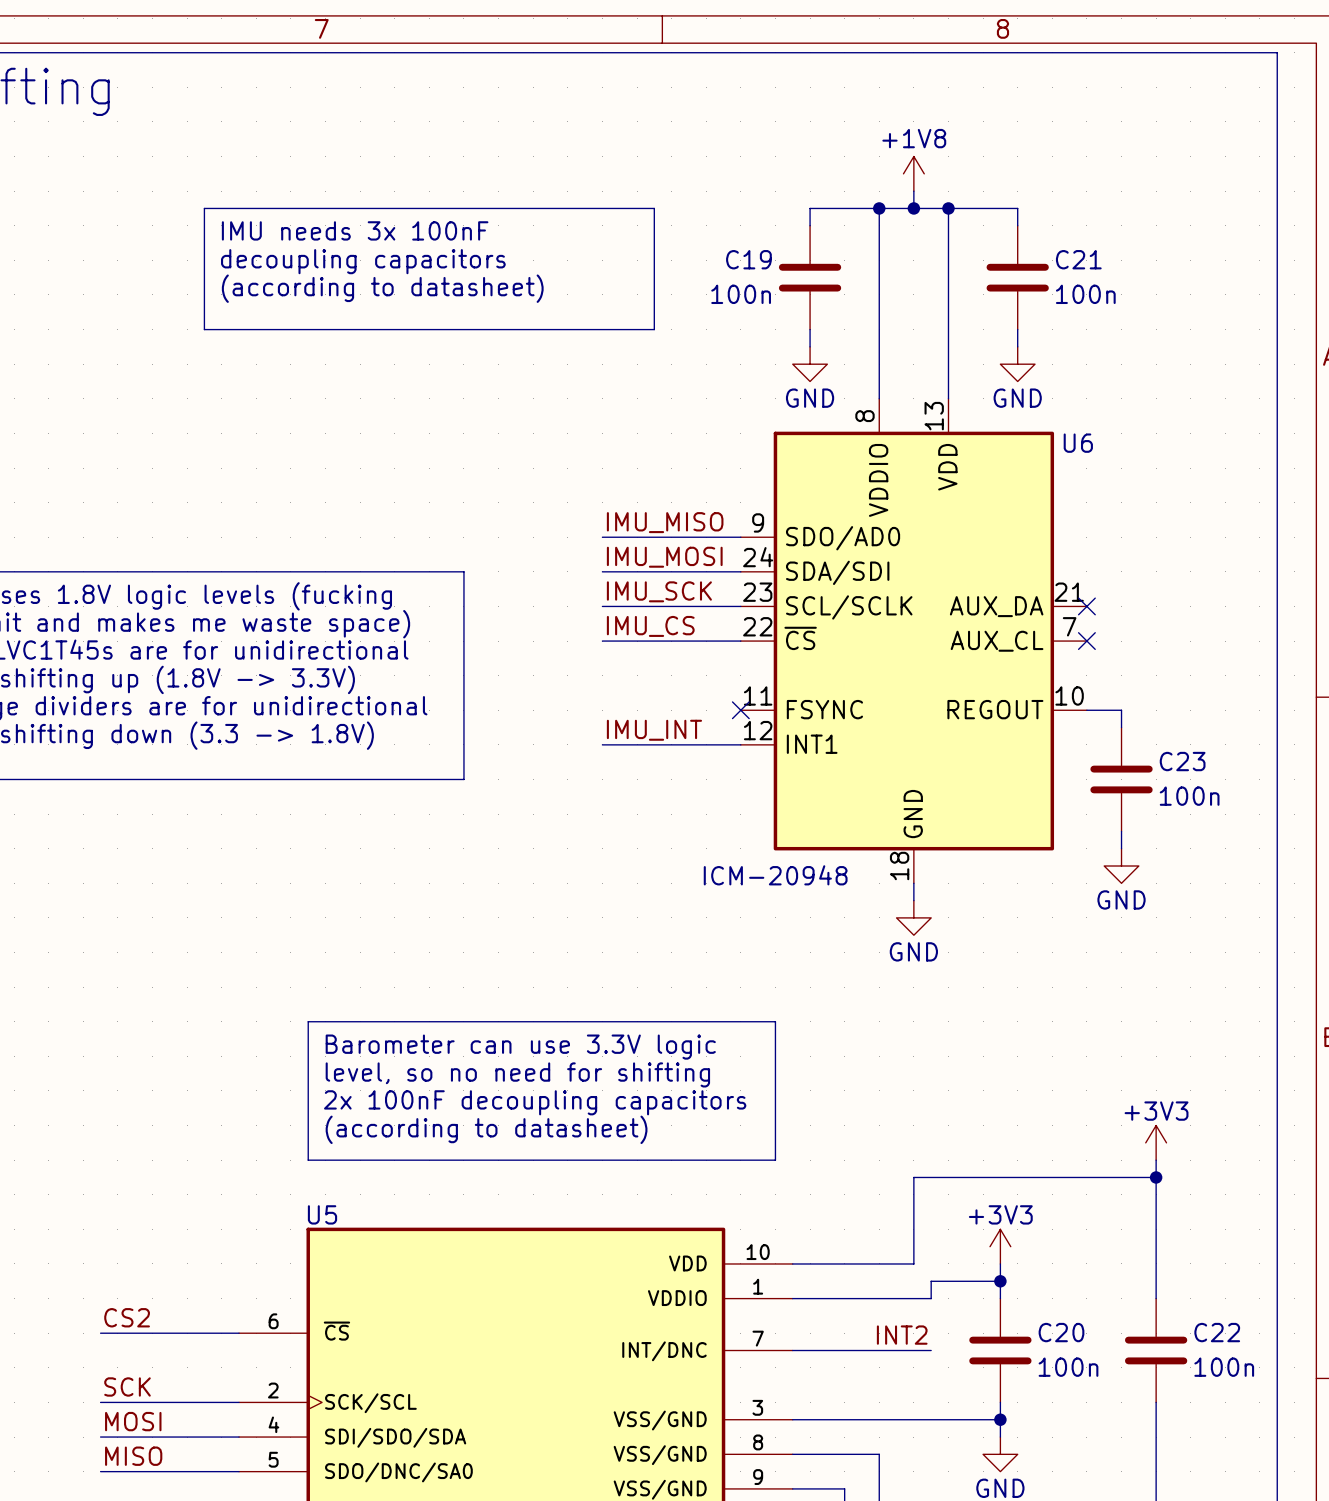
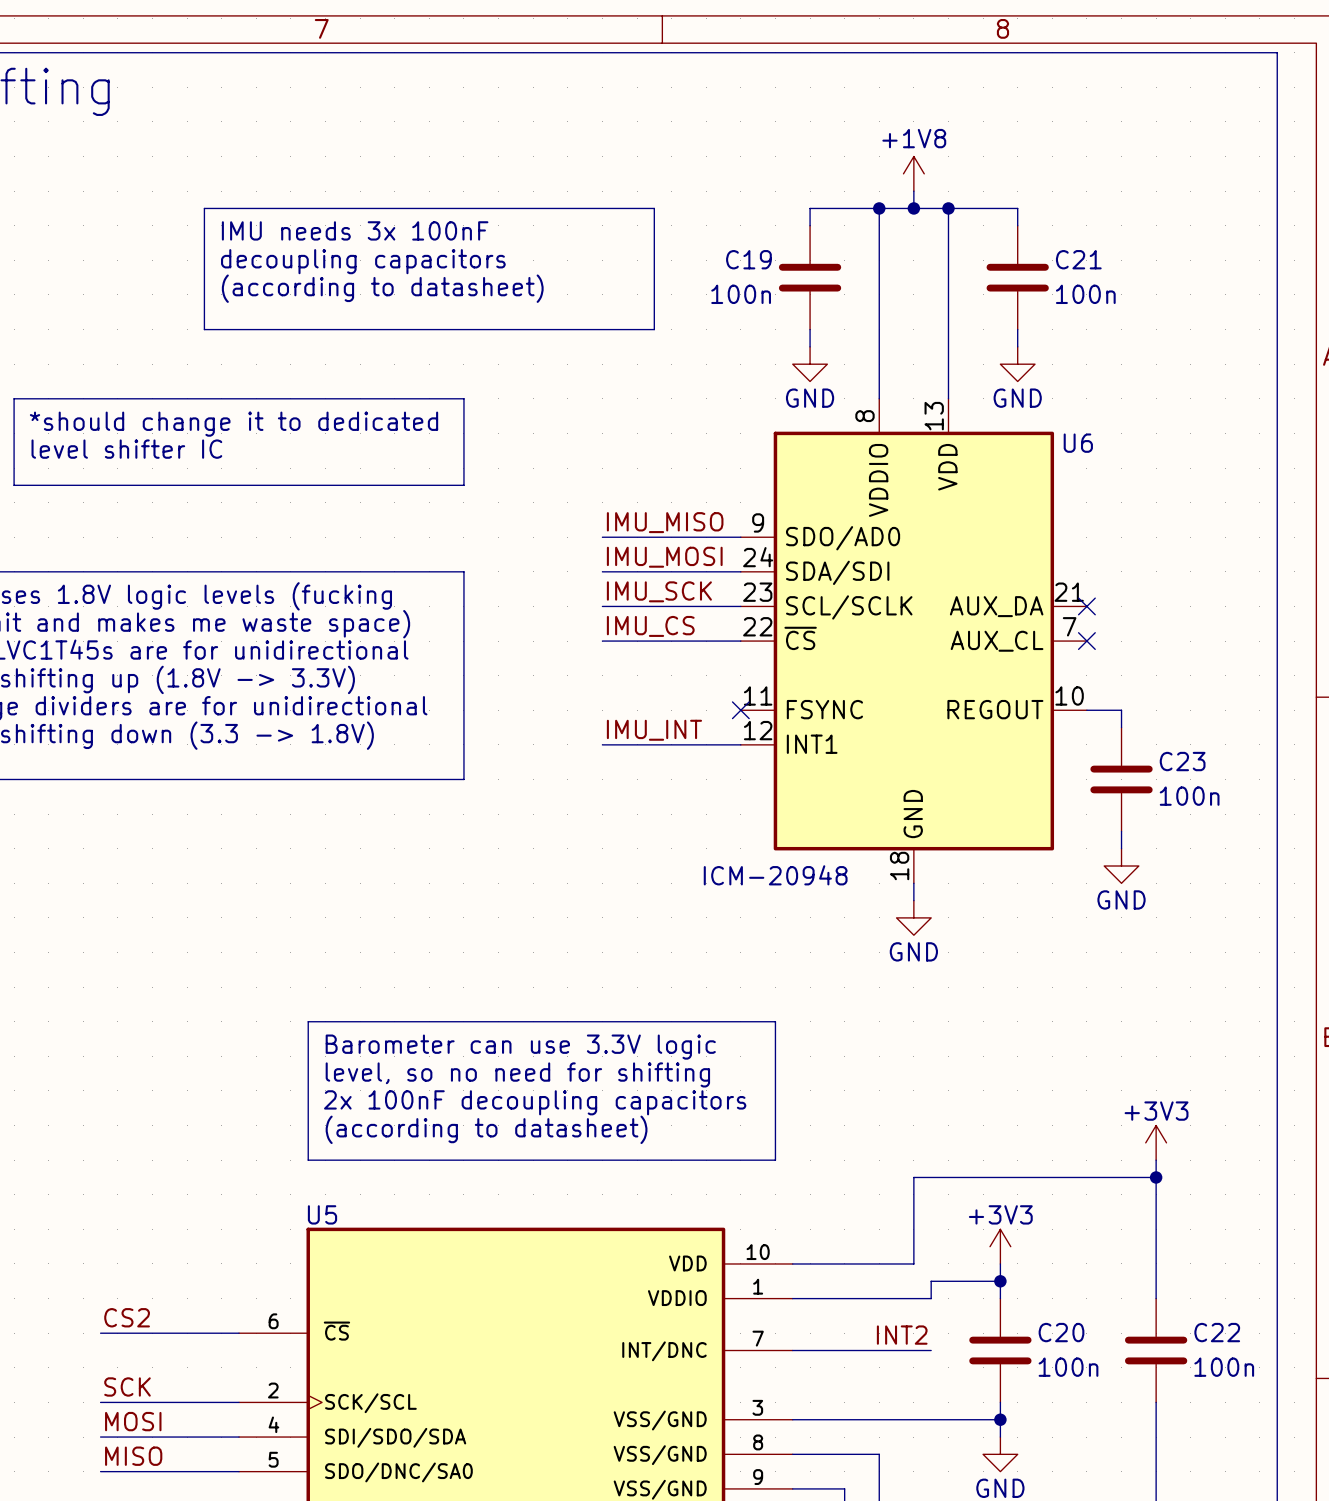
line: none -> (14, 398) (463, 398) (463, 485) (14, 485) (14, 398)
text: none -> *should change it to dedicated (234, 424)
text: none -> level shifter IC (126, 449)

